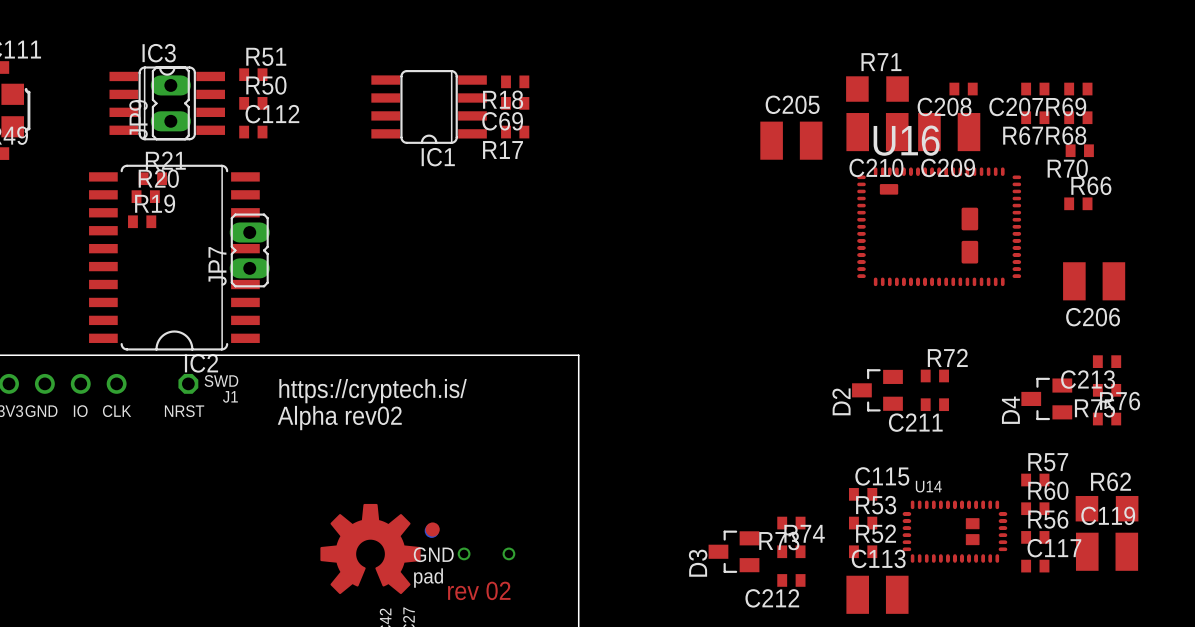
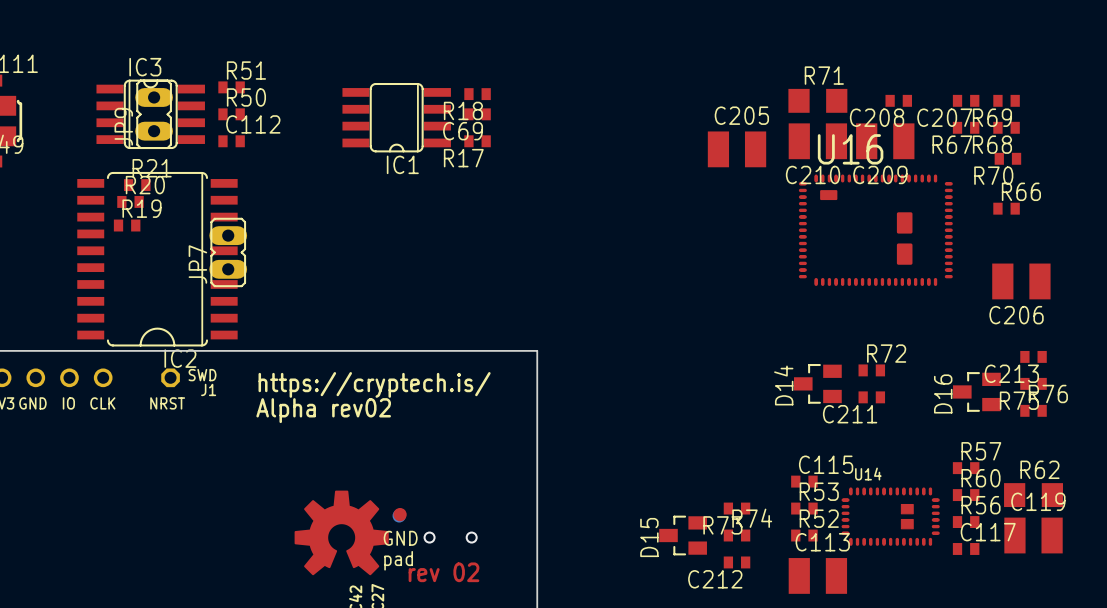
D2 name: D2 (841, 401) -> D14 (783, 385)
D4 name: D4 (1010, 410) -> D16 (943, 393)
D3 name: D3 (698, 563) -> D15 (649, 537)

